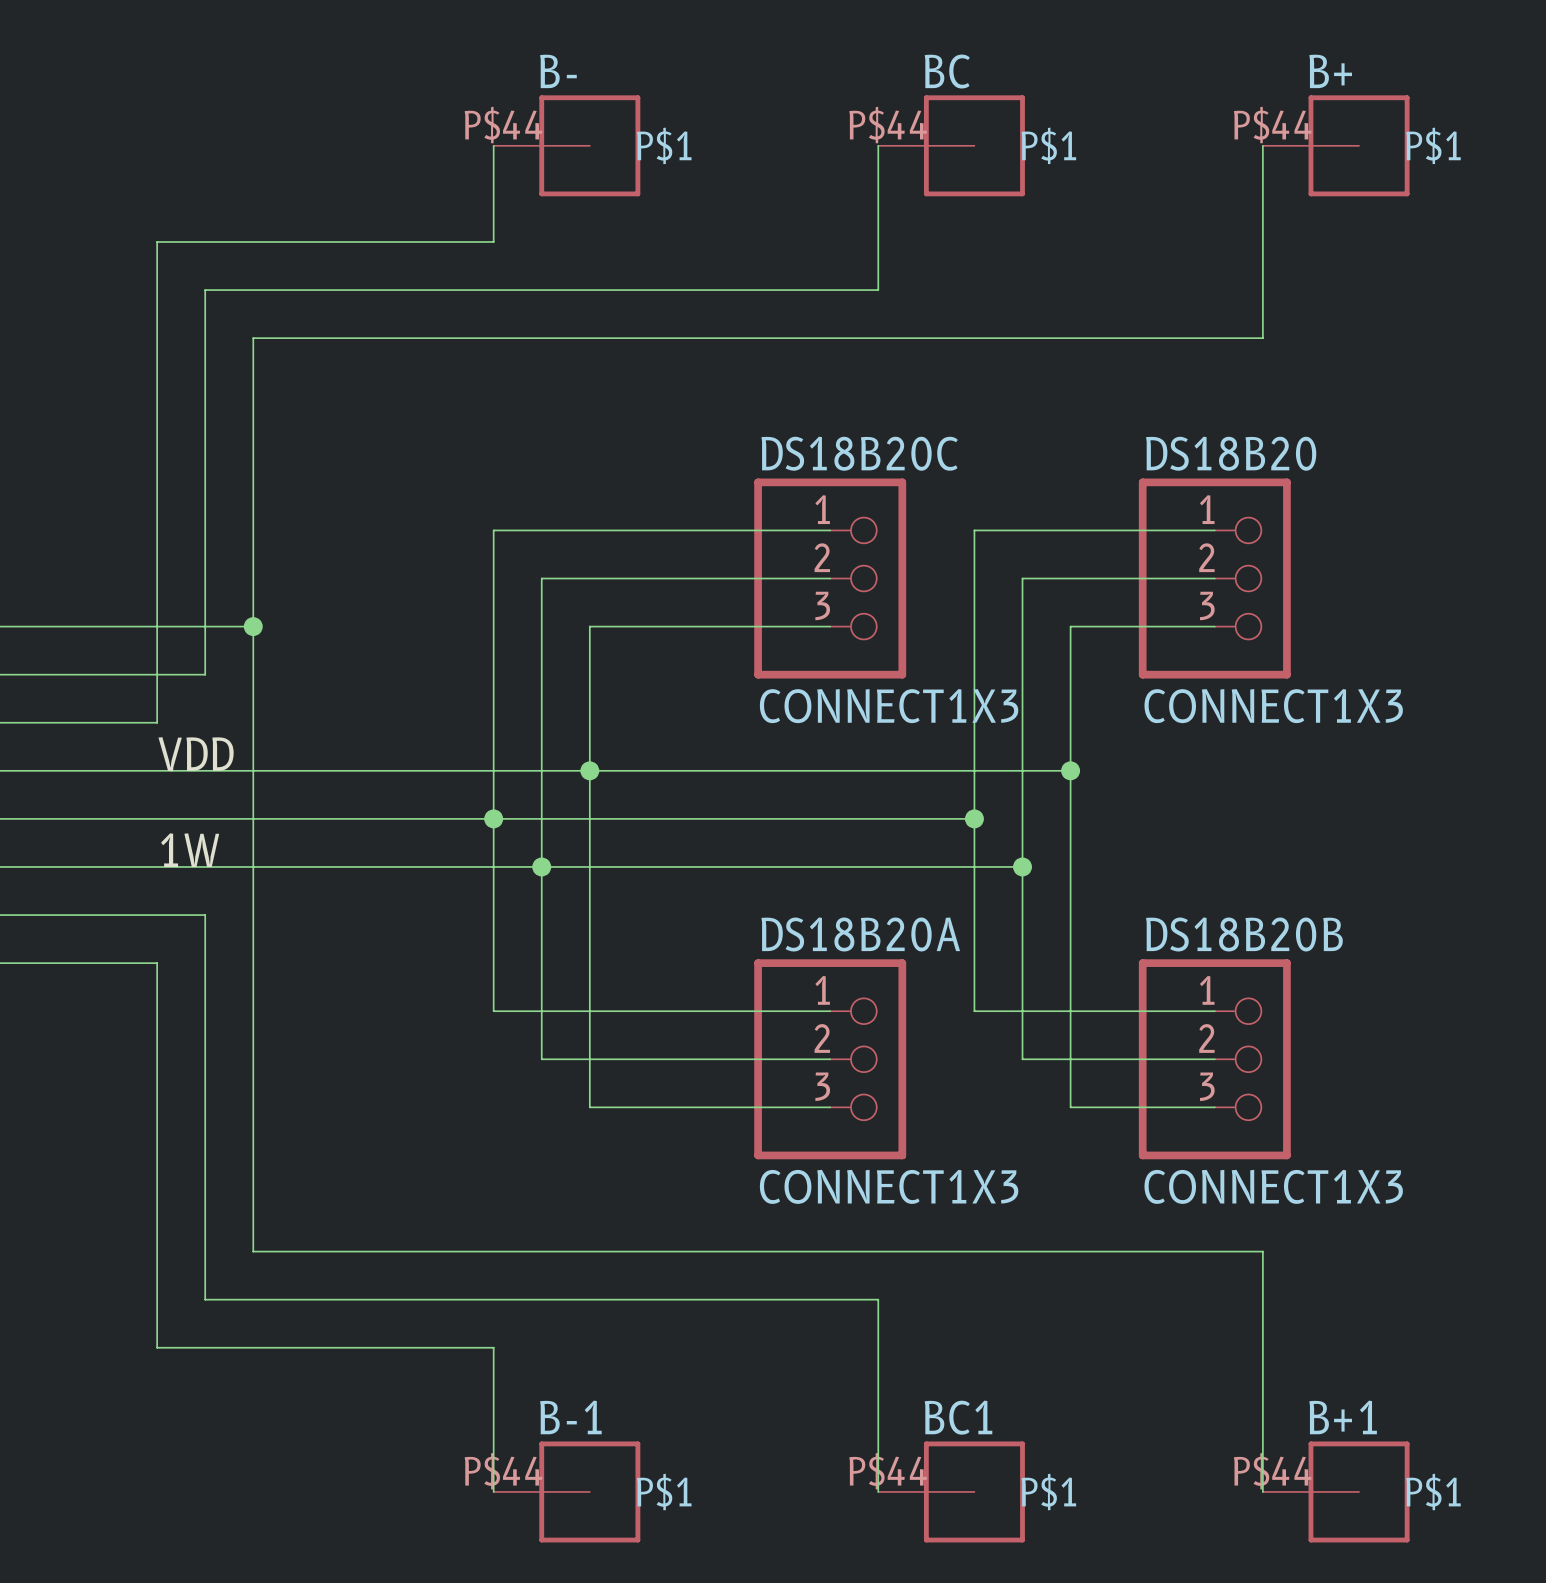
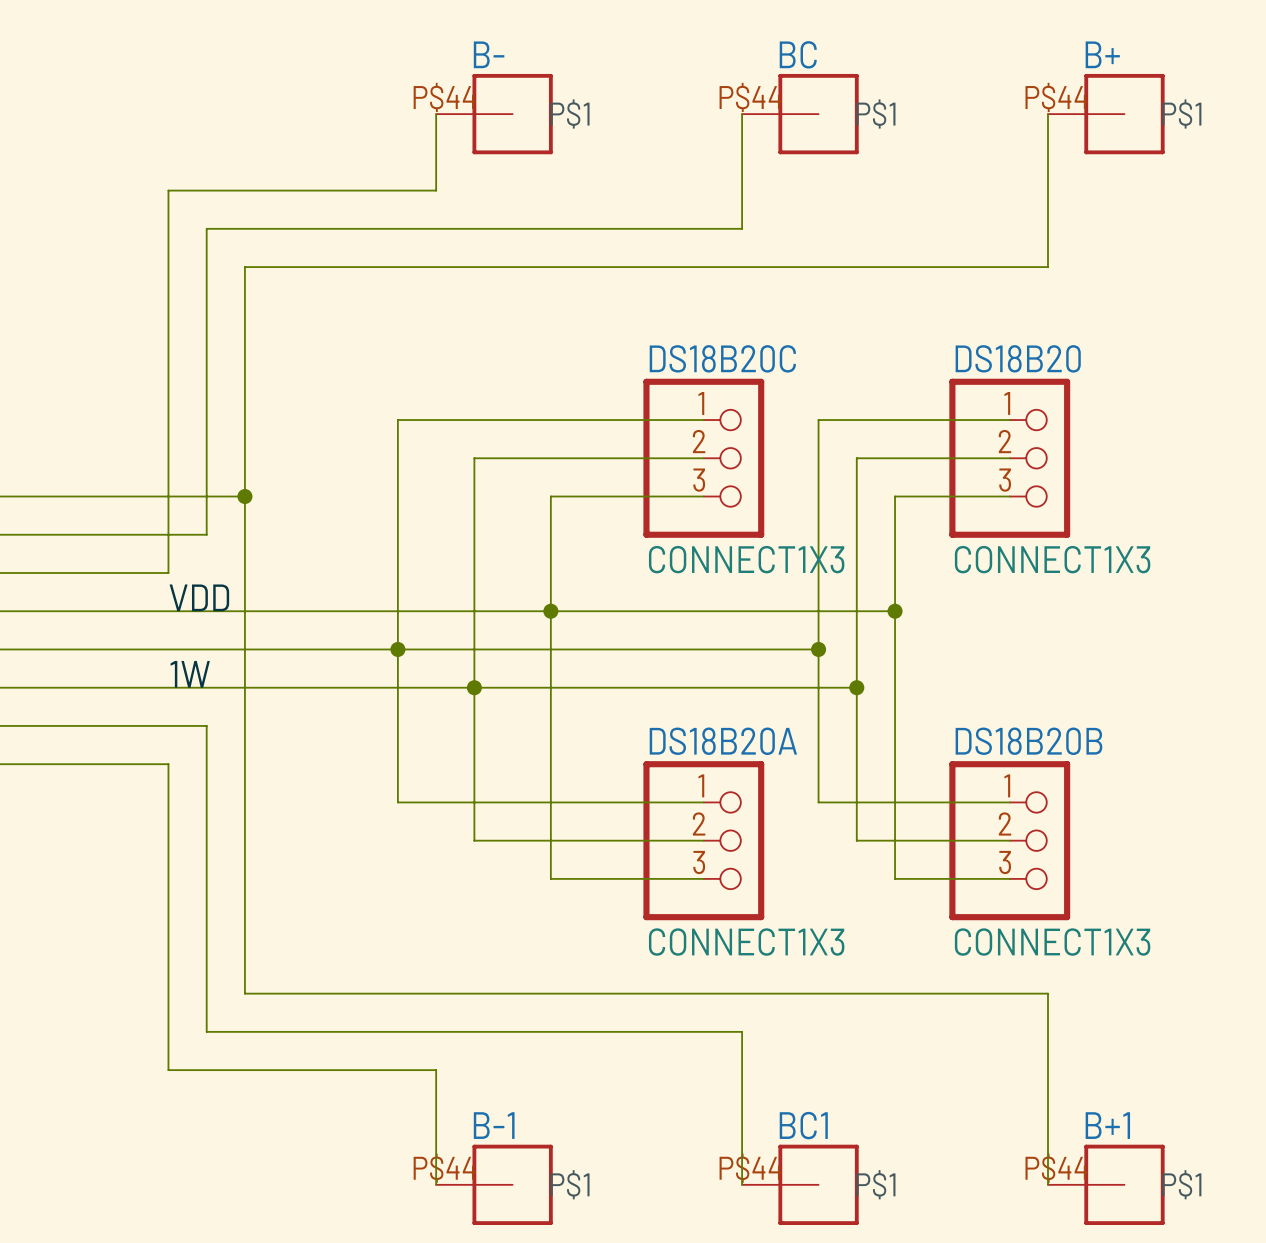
wire: (493, 530) (493, 1011) -> (436, 420) (397, 420) (397, 802) (436, 802)
wire: (637, 626) (589, 626) (589, 1107) (637, 1107) -> (550, 496) (550, 878)
junction position: (589, 770) -> (550, 611)
junction position: (493, 818) -> (397, 649)

